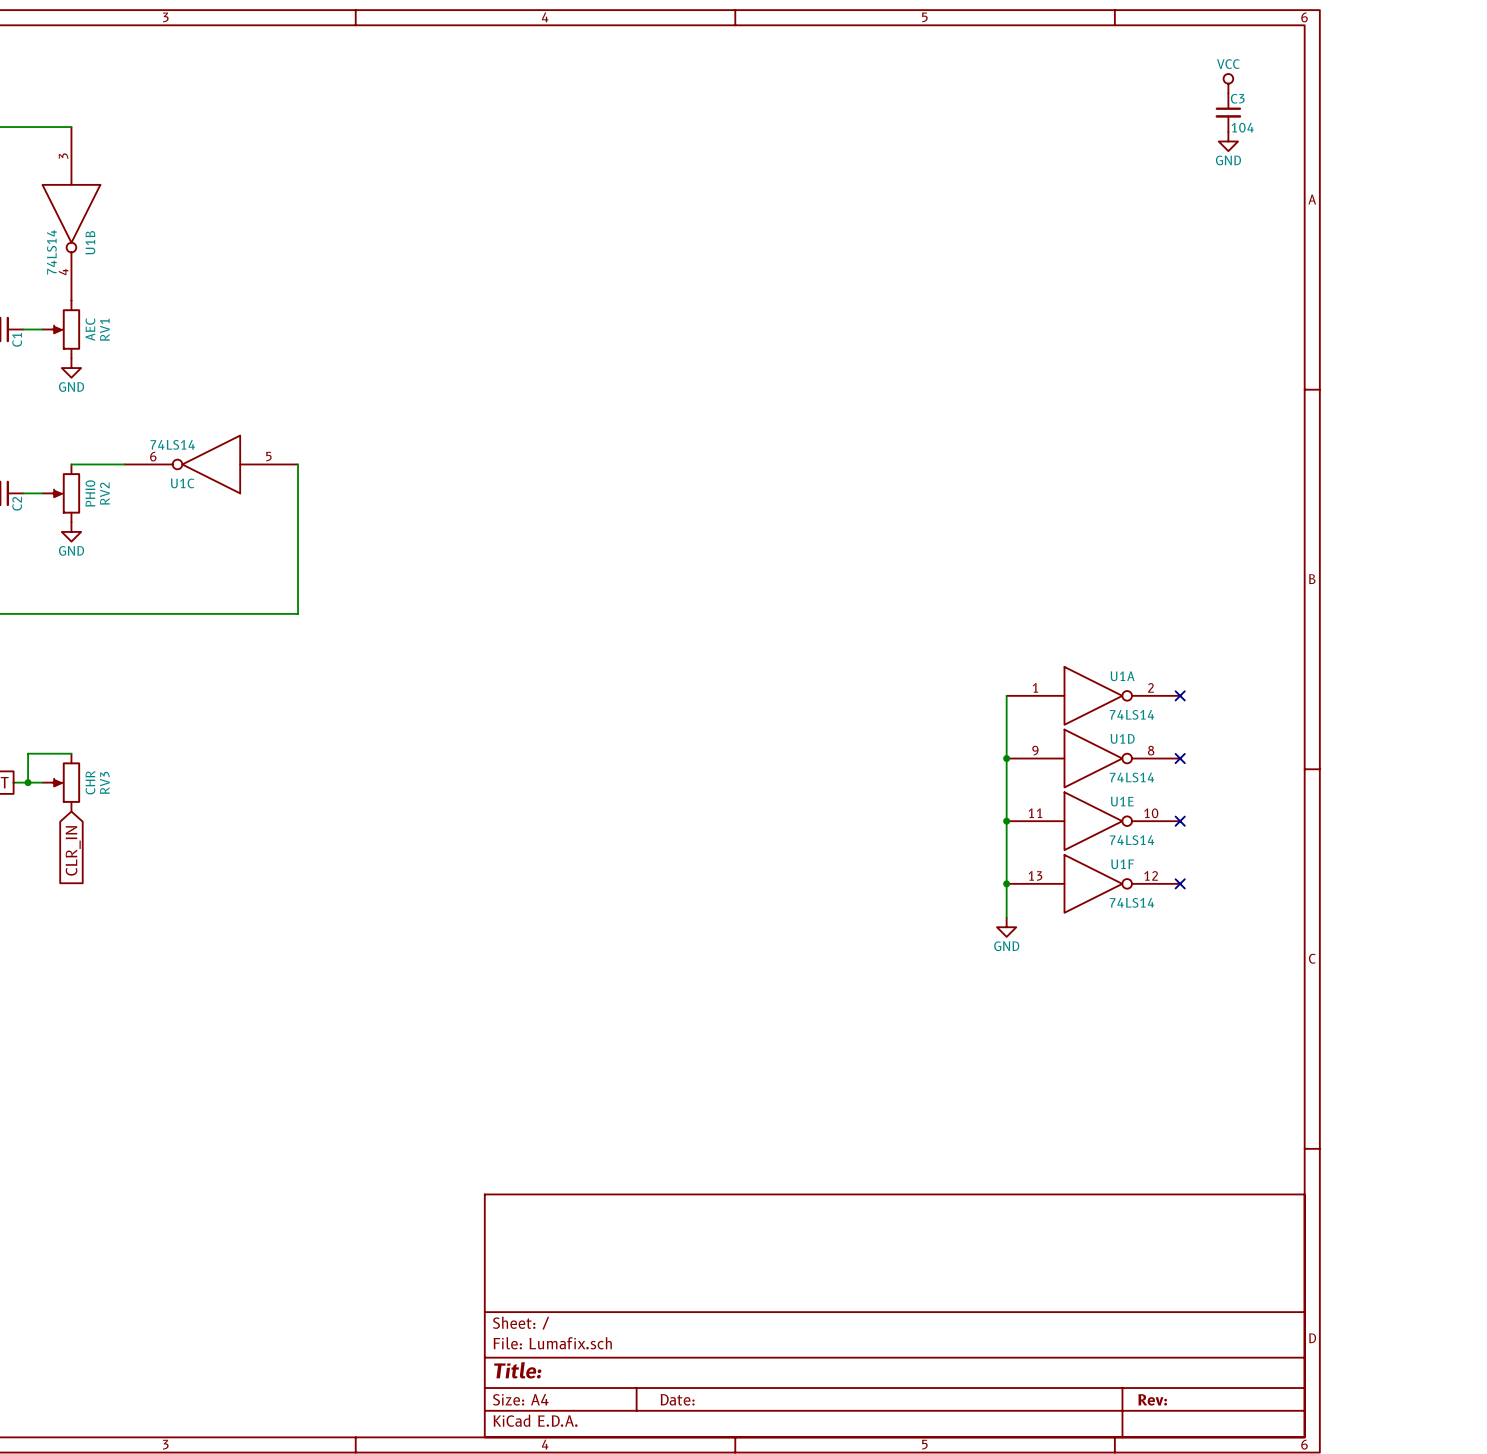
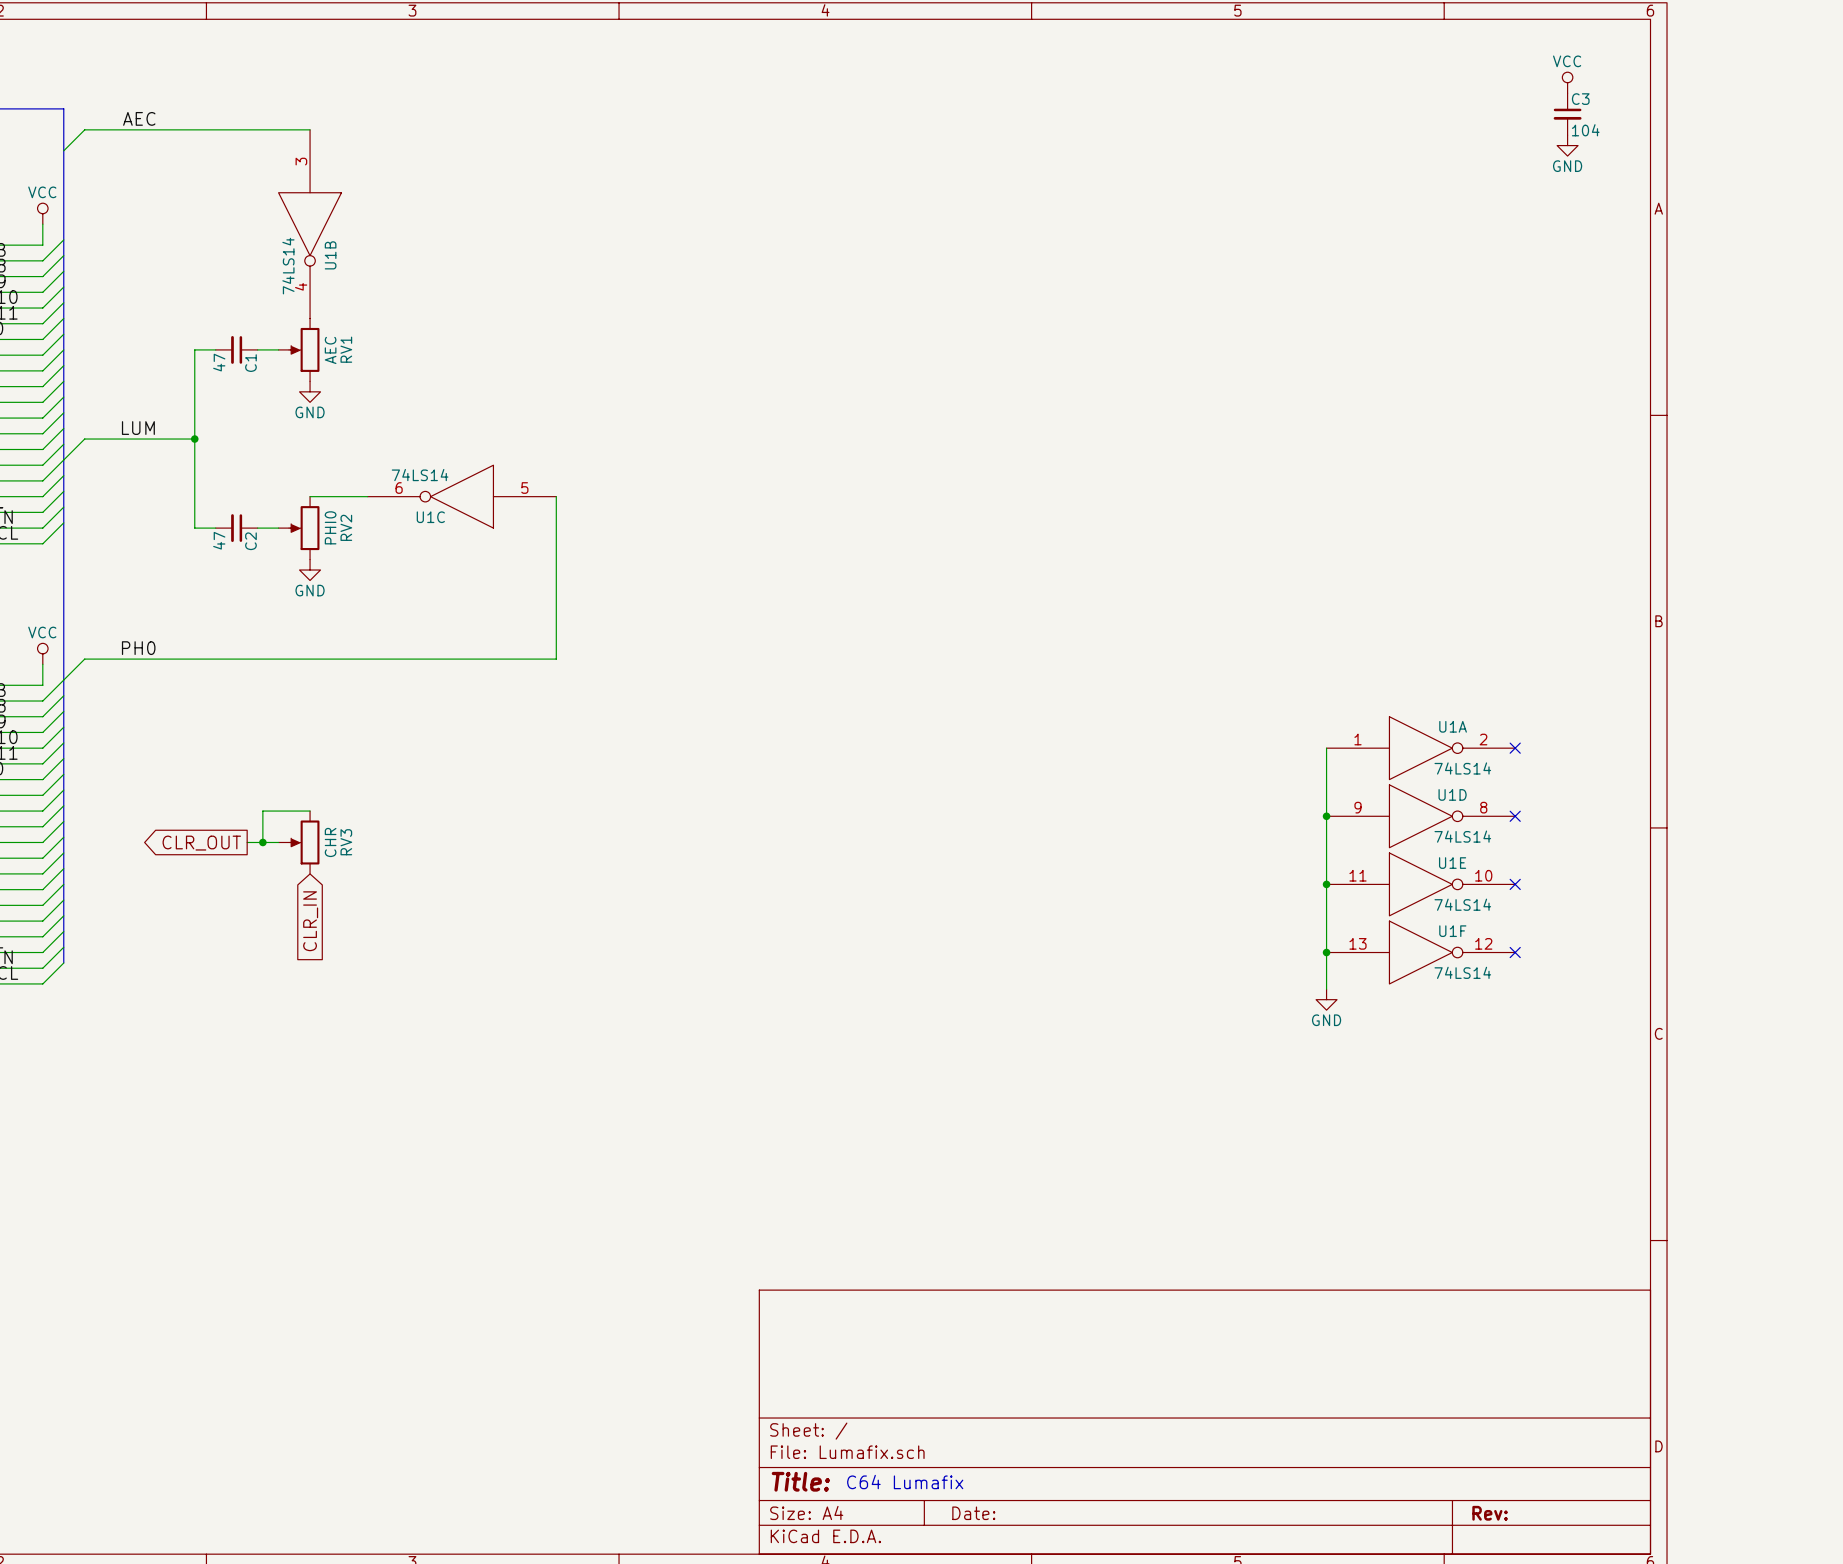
text: none -> C64 Lumafix (905, 1482)

